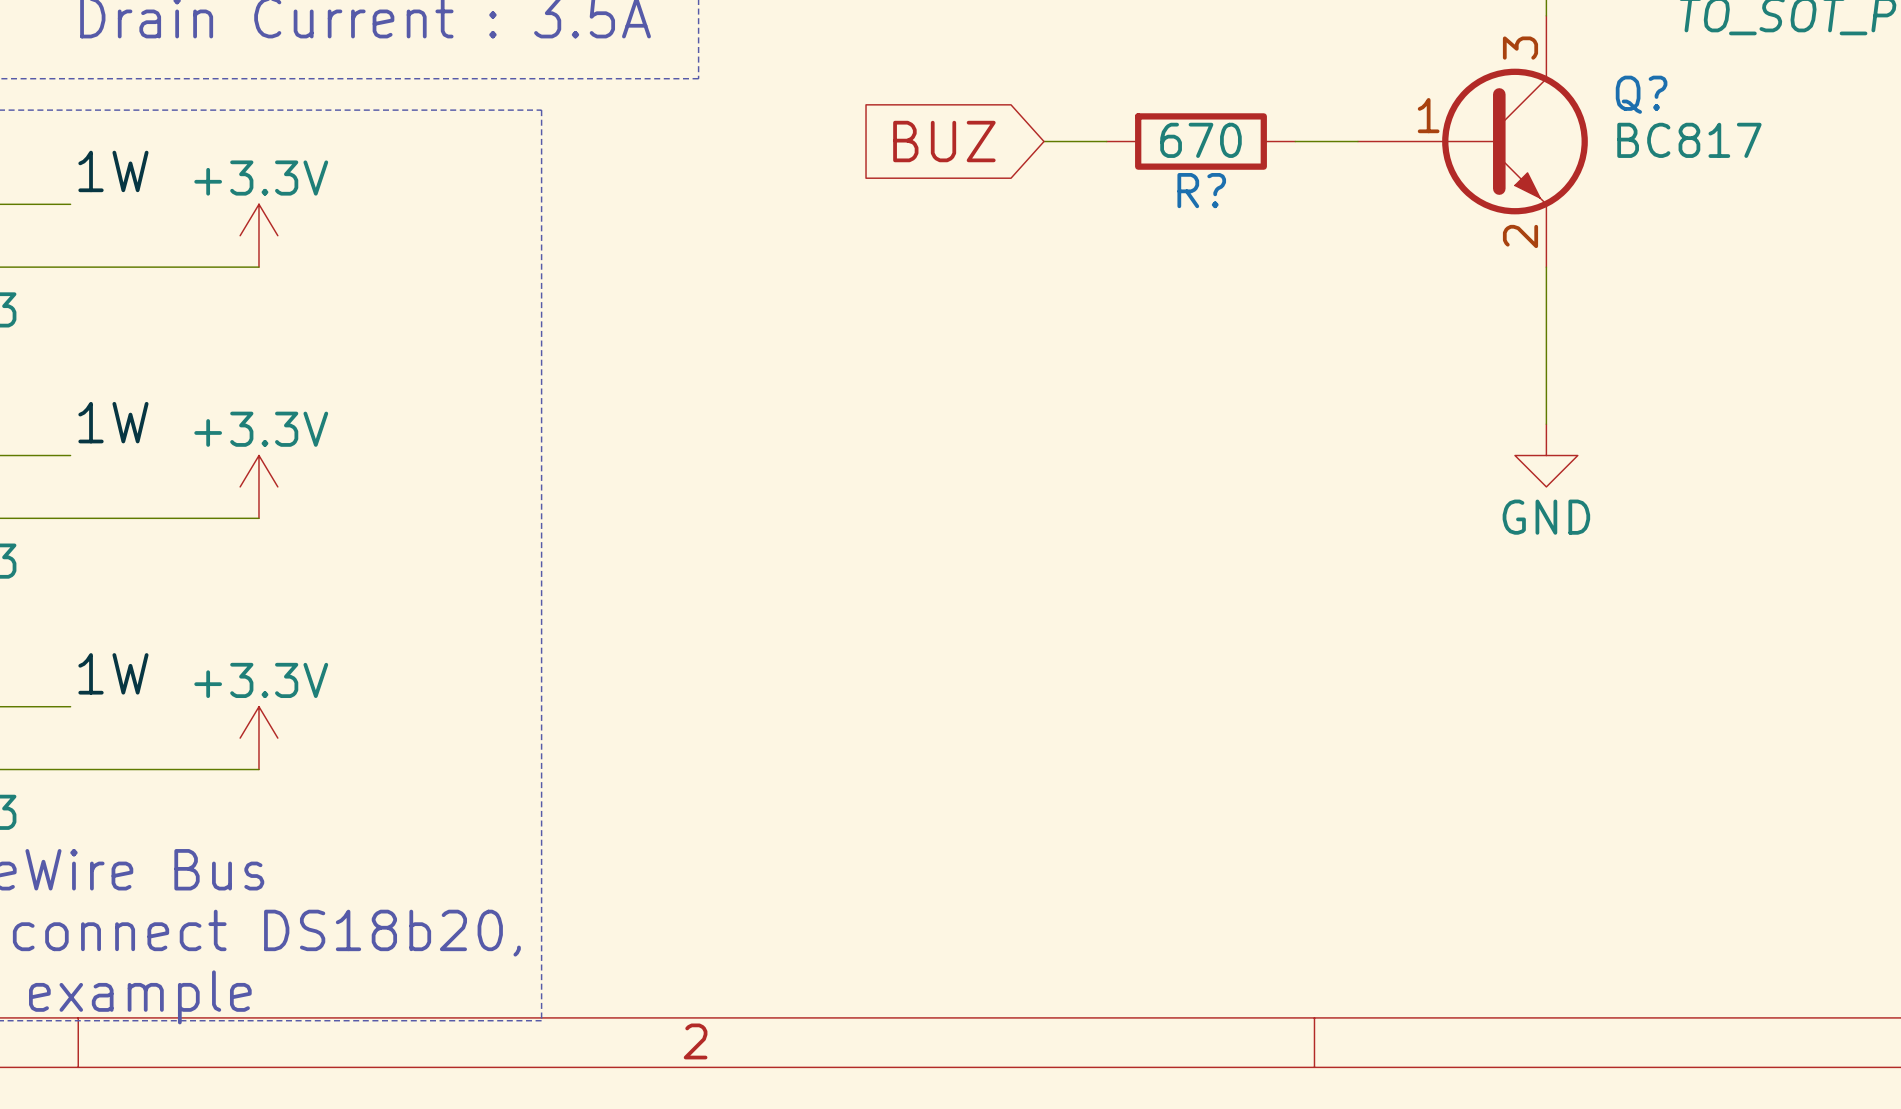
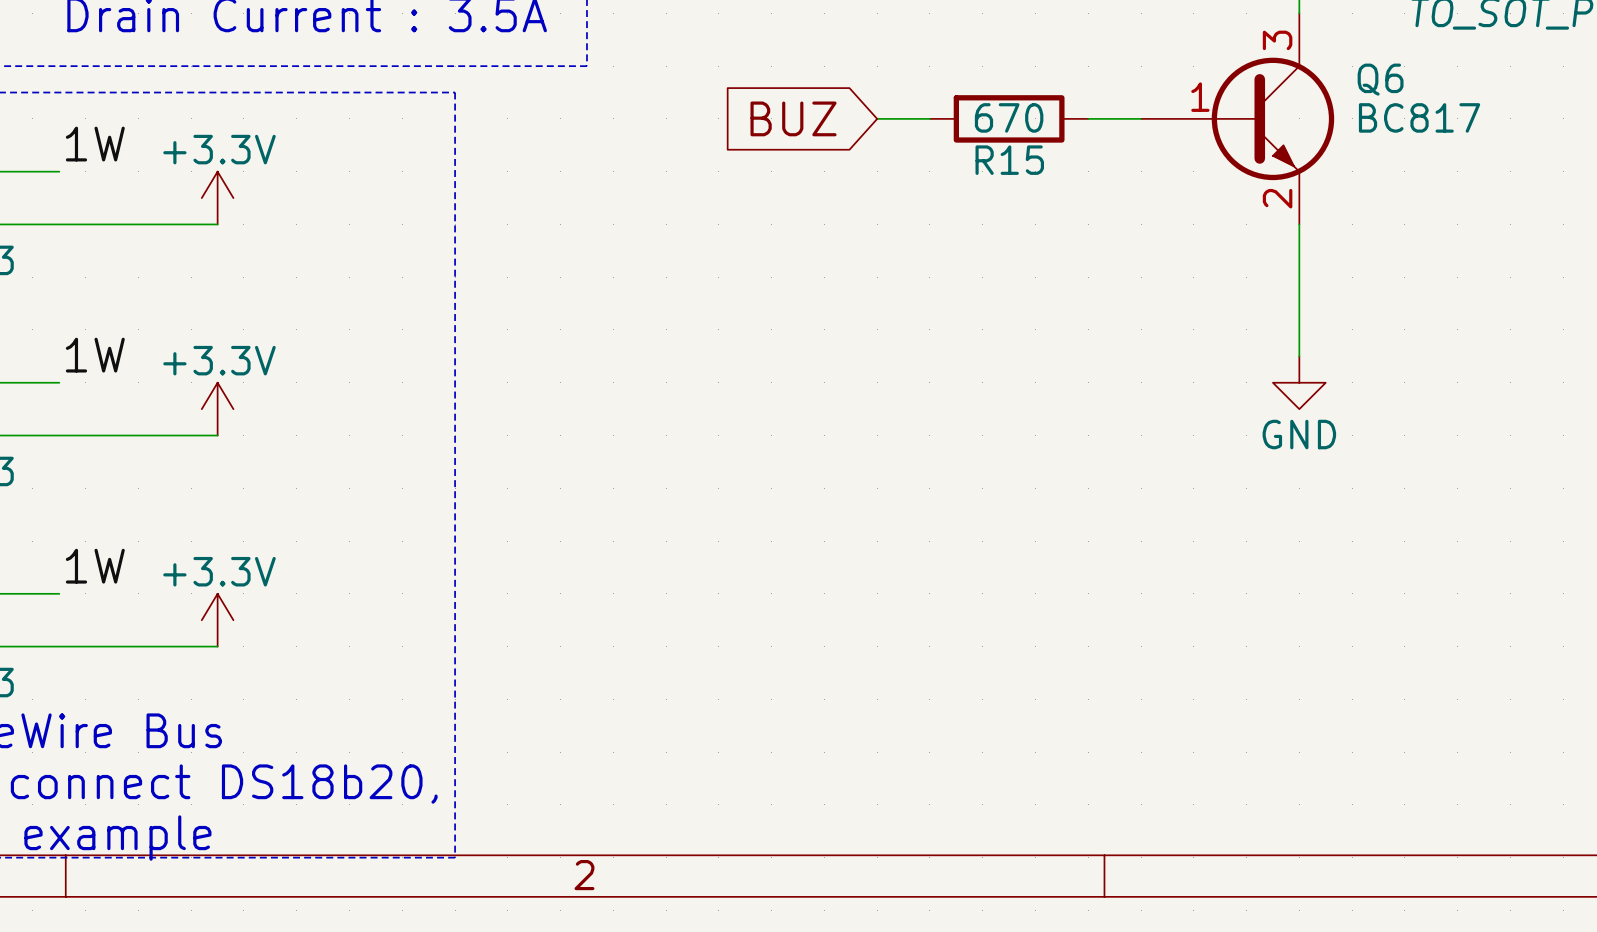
Q? name: Q? (1641, 94) -> Q6 (1380, 79)
R? name: R? (1201, 190) -> R15 (1009, 160)

